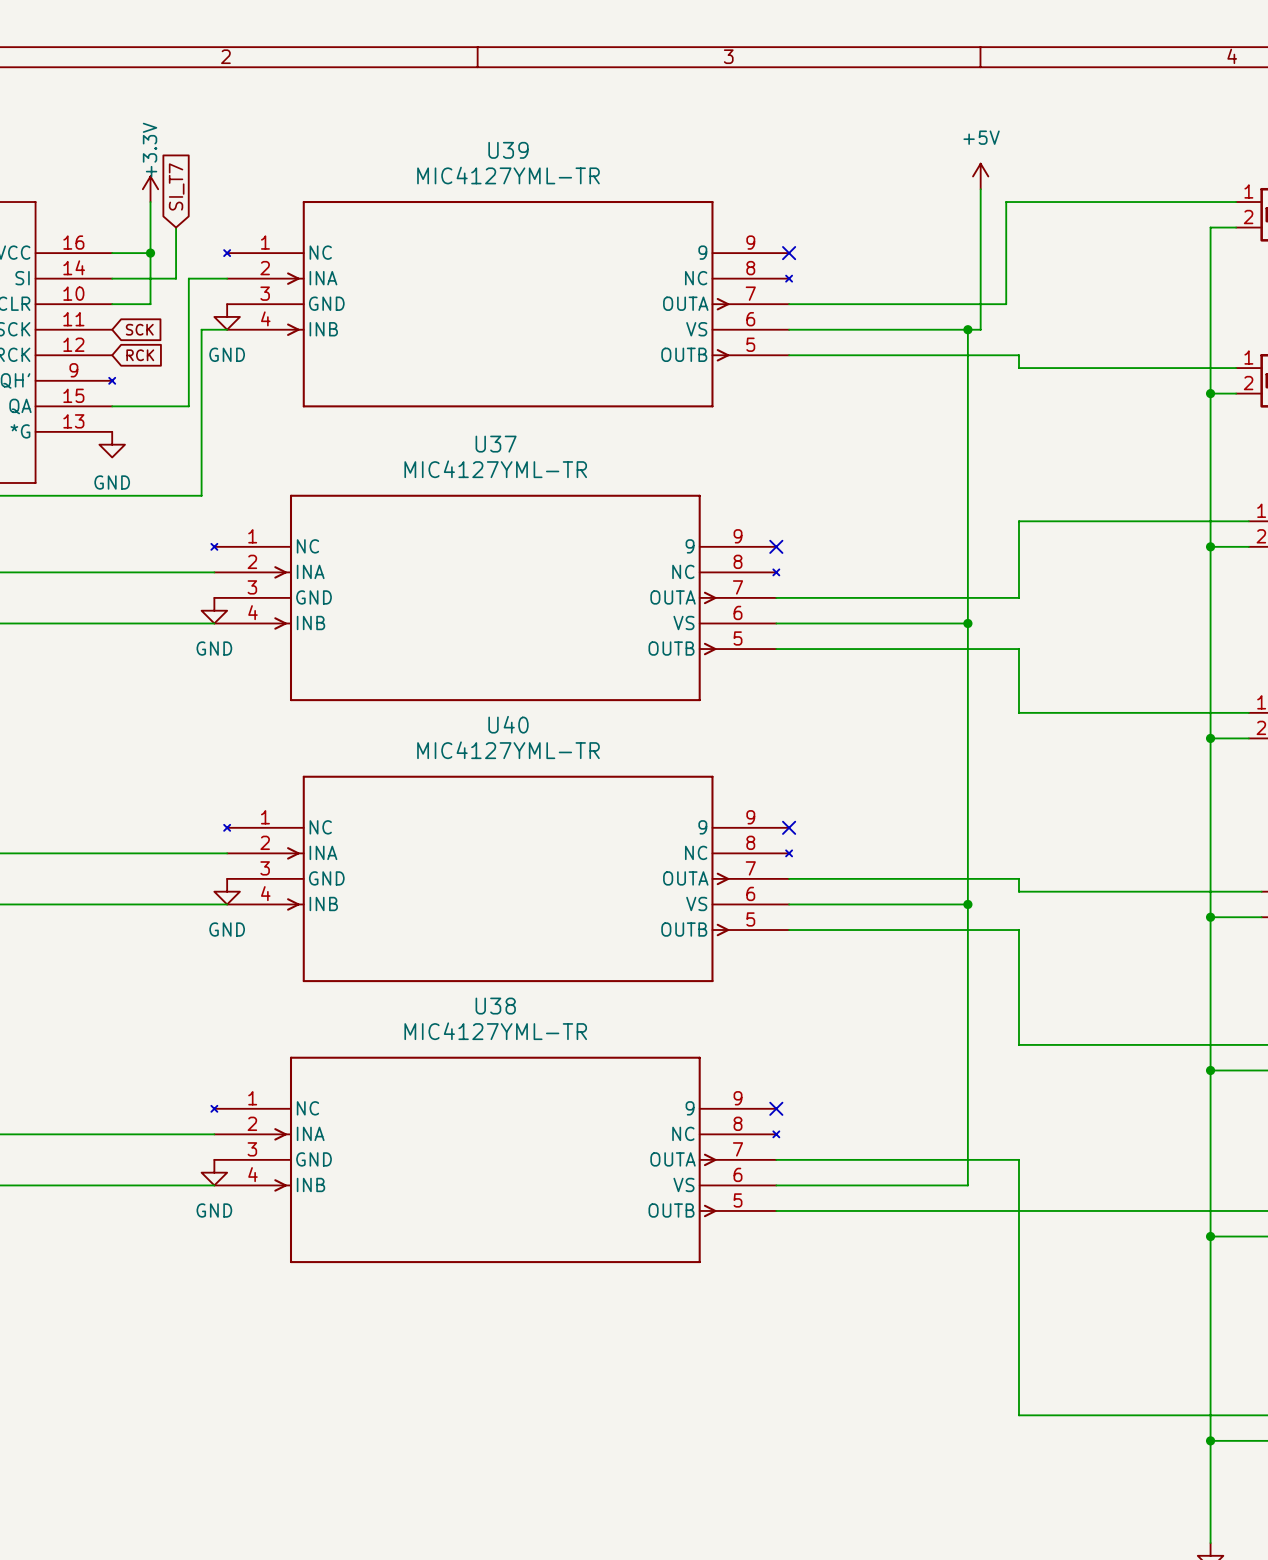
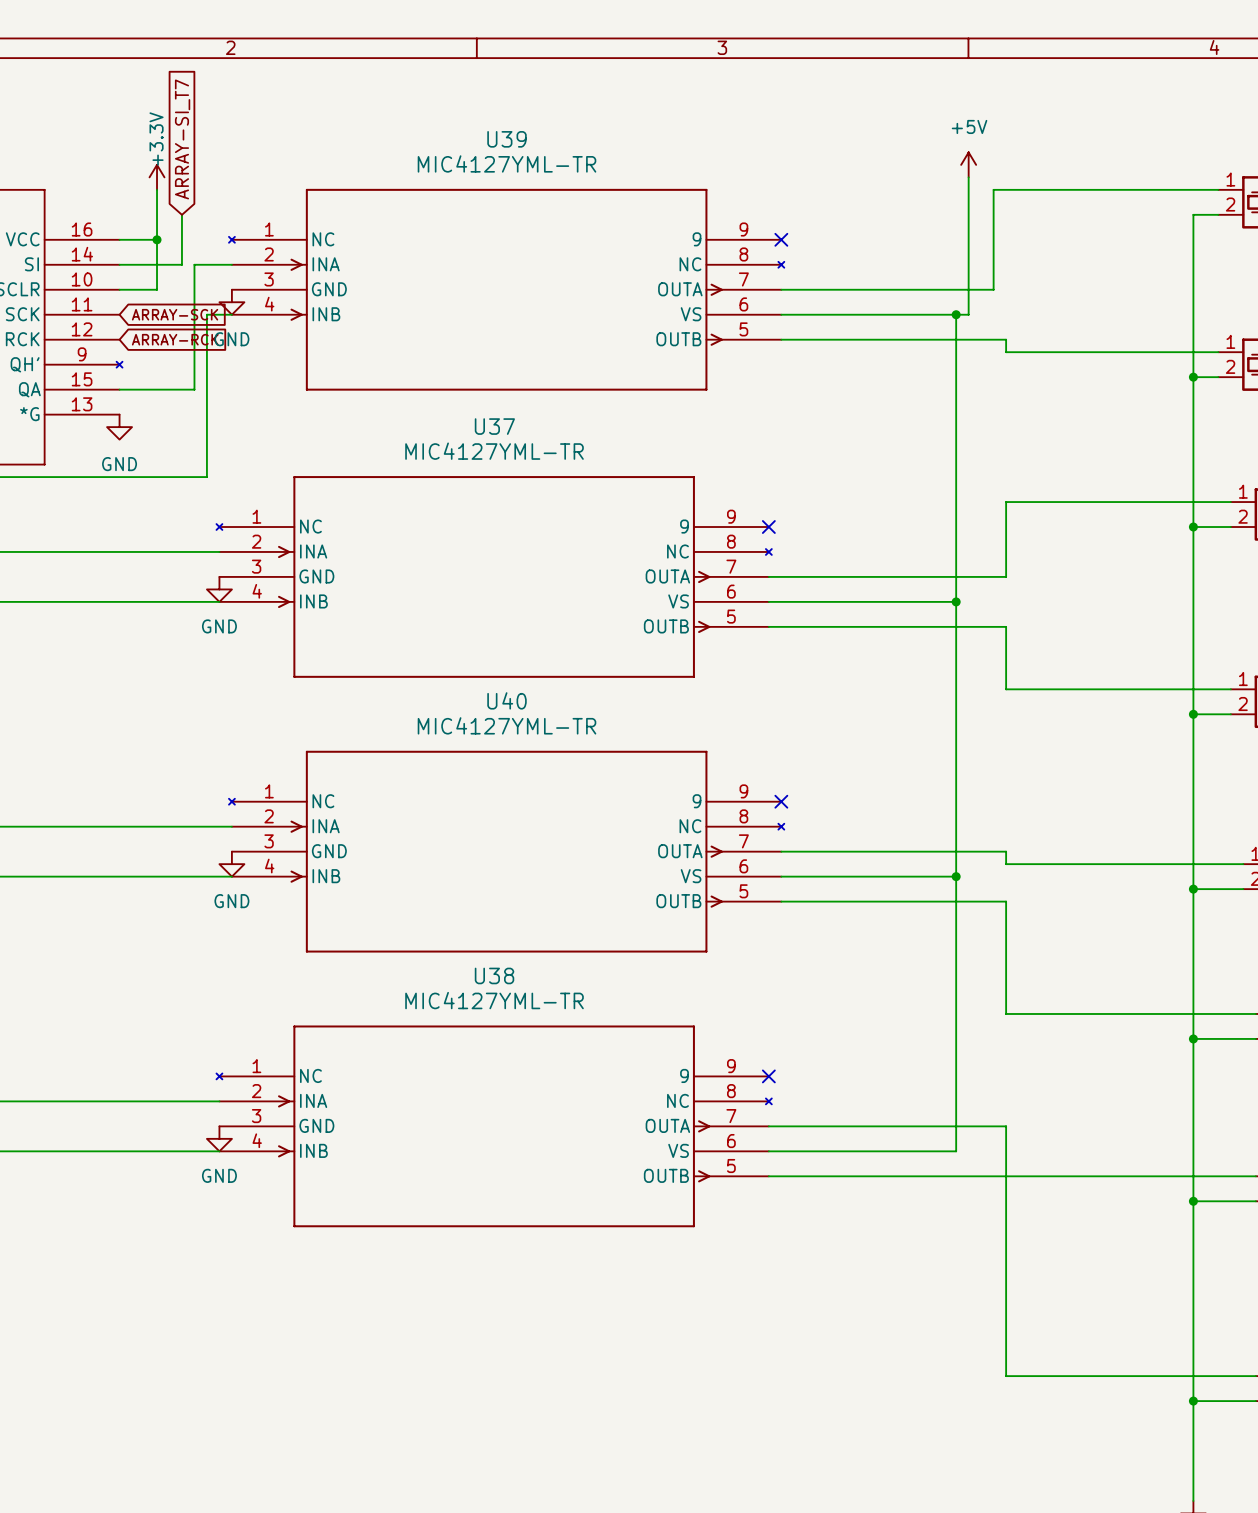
global label: SI_T7 (176, 186) -> ARRAY-SI_T7 (182, 139)
global label: SCK (139, 329) -> ARRAY-SCK (175, 314)
global label: RCK (140, 355) -> ARRAY-RCK (175, 339)

